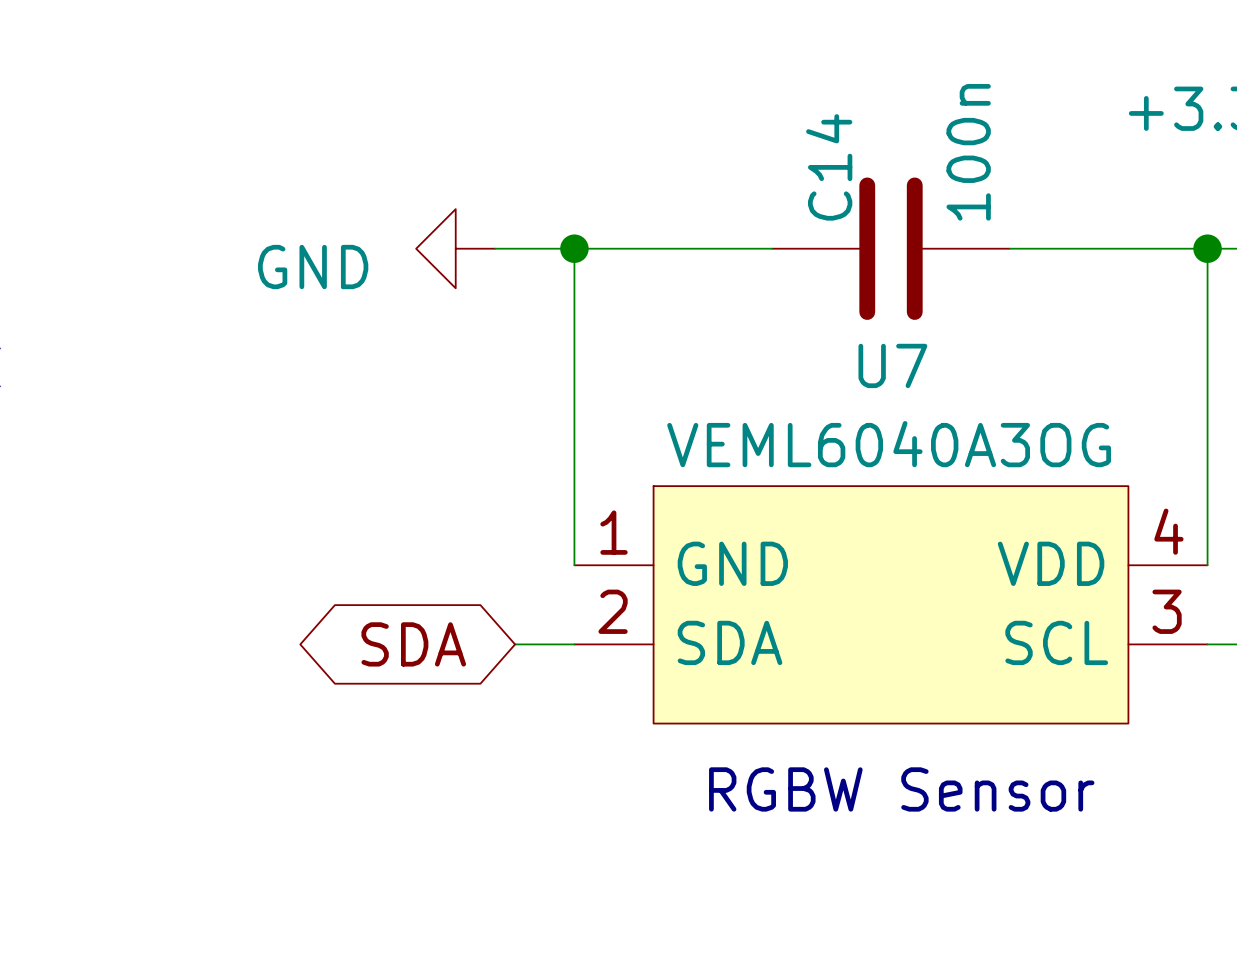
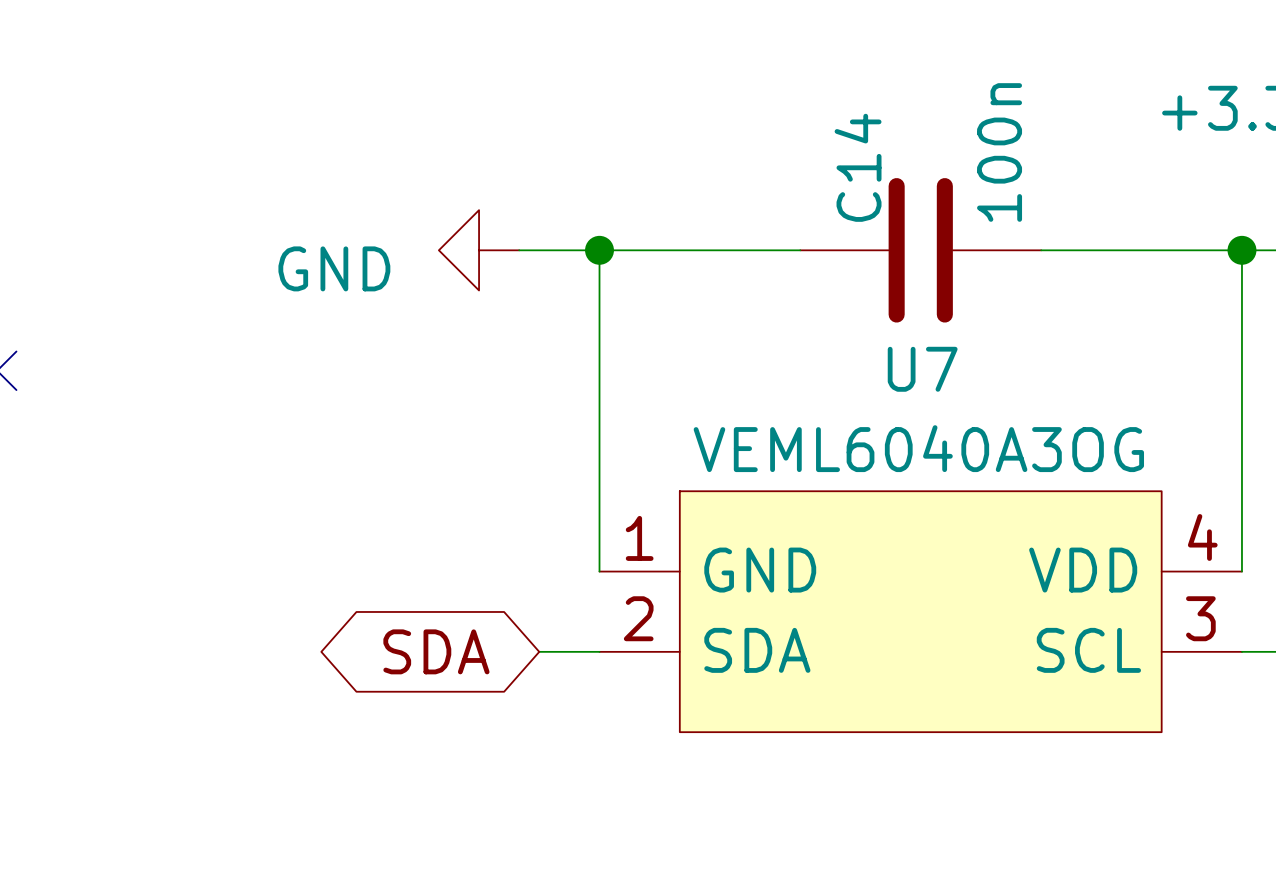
text: RGBW Sensor (901, 789) -> none

